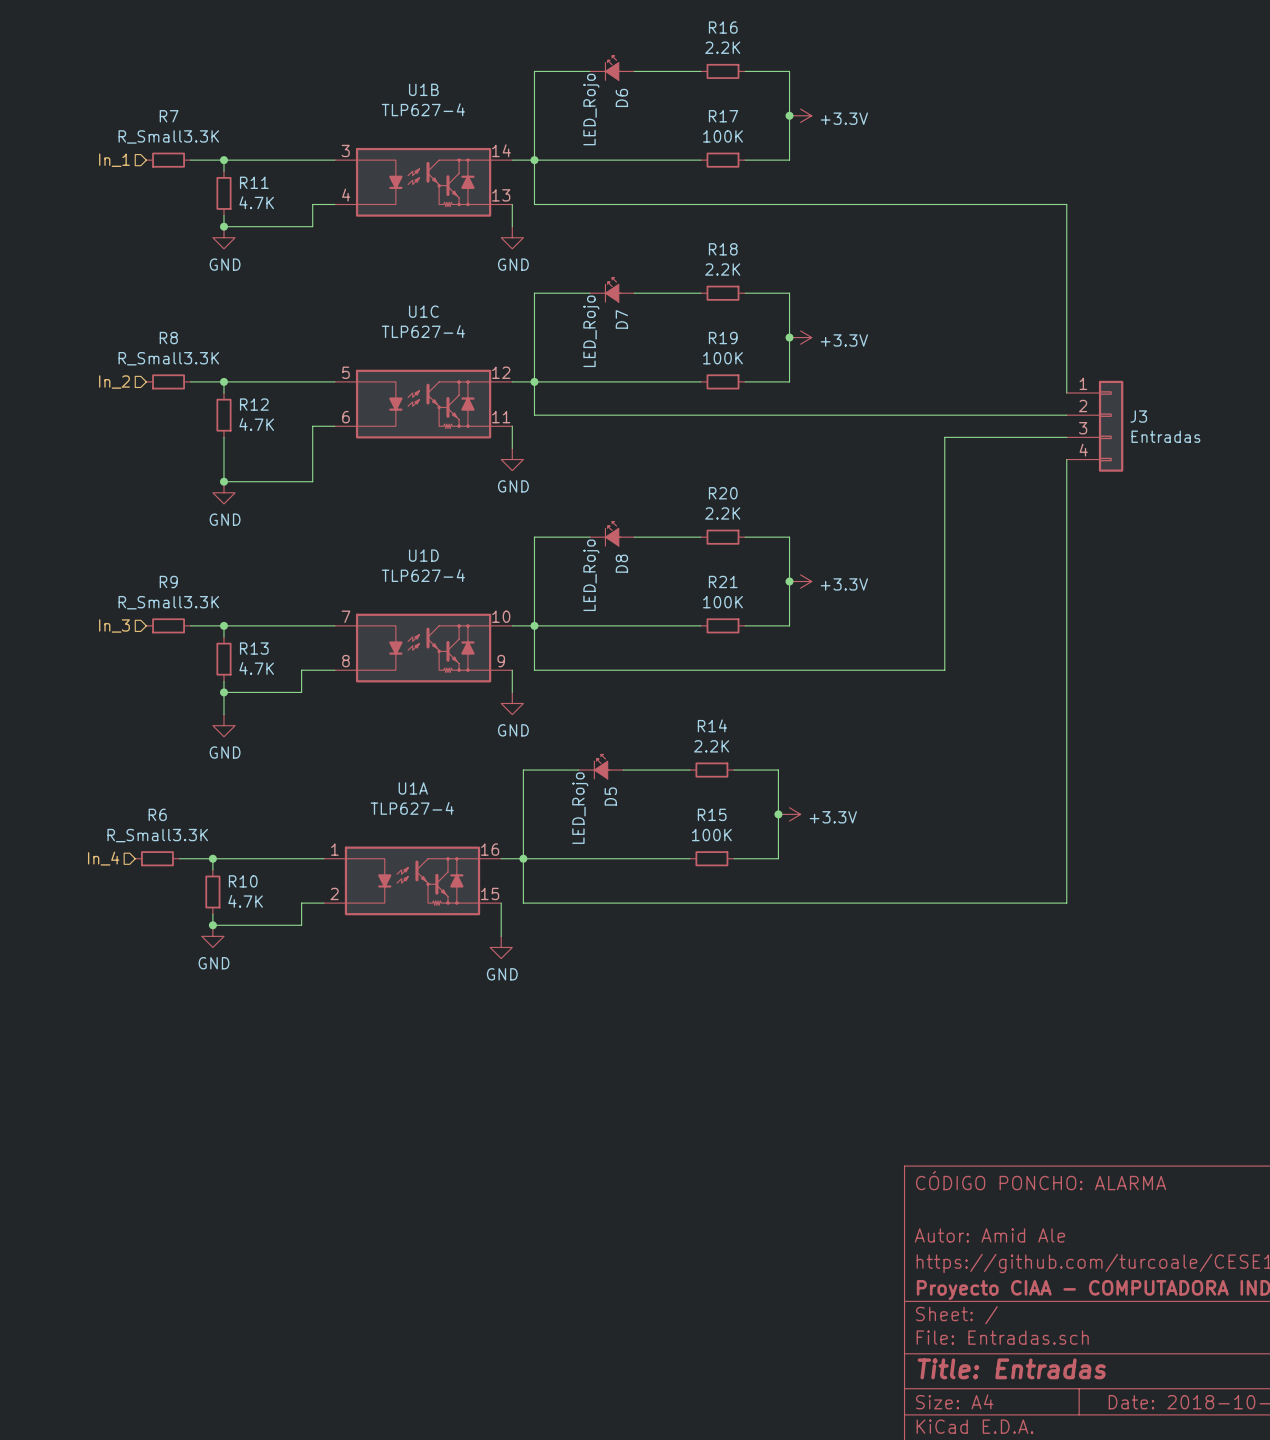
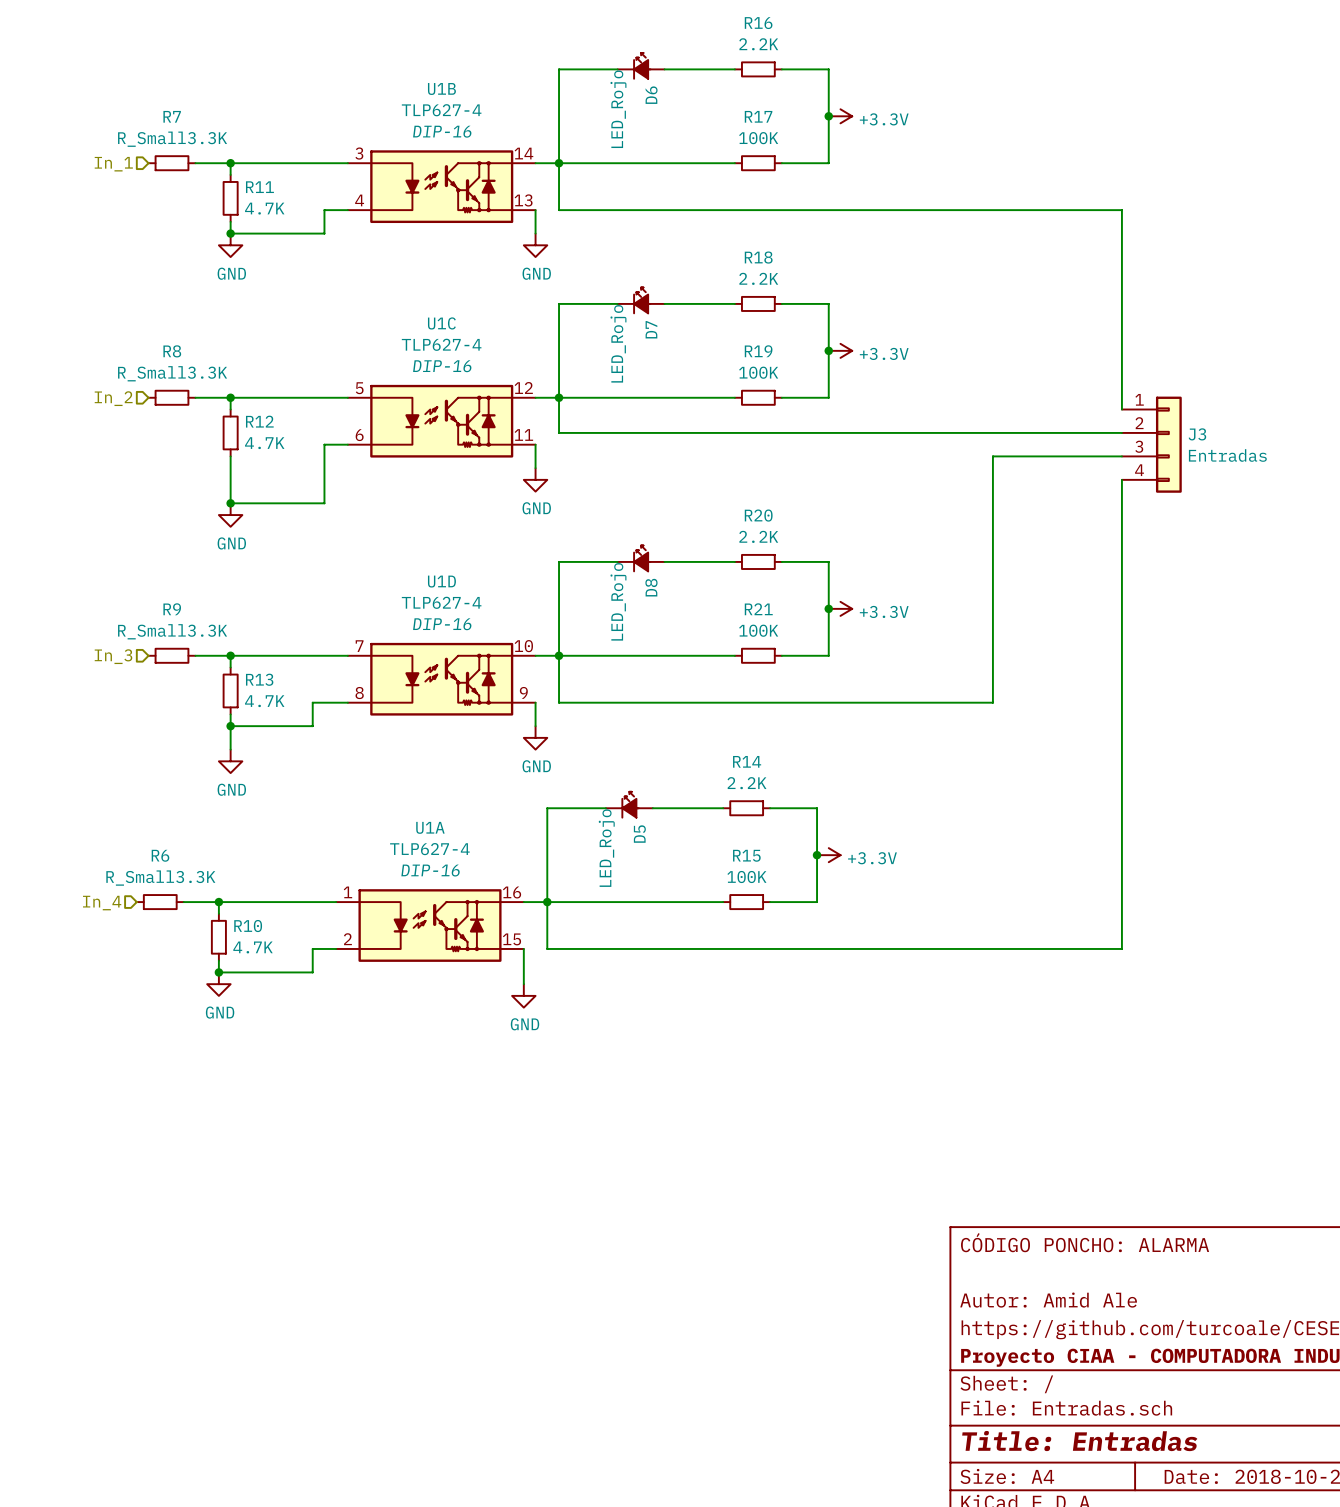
U1B text: none -> DIP-16 (442, 131)
U1C text: none -> DIP-16 (442, 366)
U1D text: none -> DIP-16 (442, 624)
U1A text: none -> DIP-16 (430, 870)

